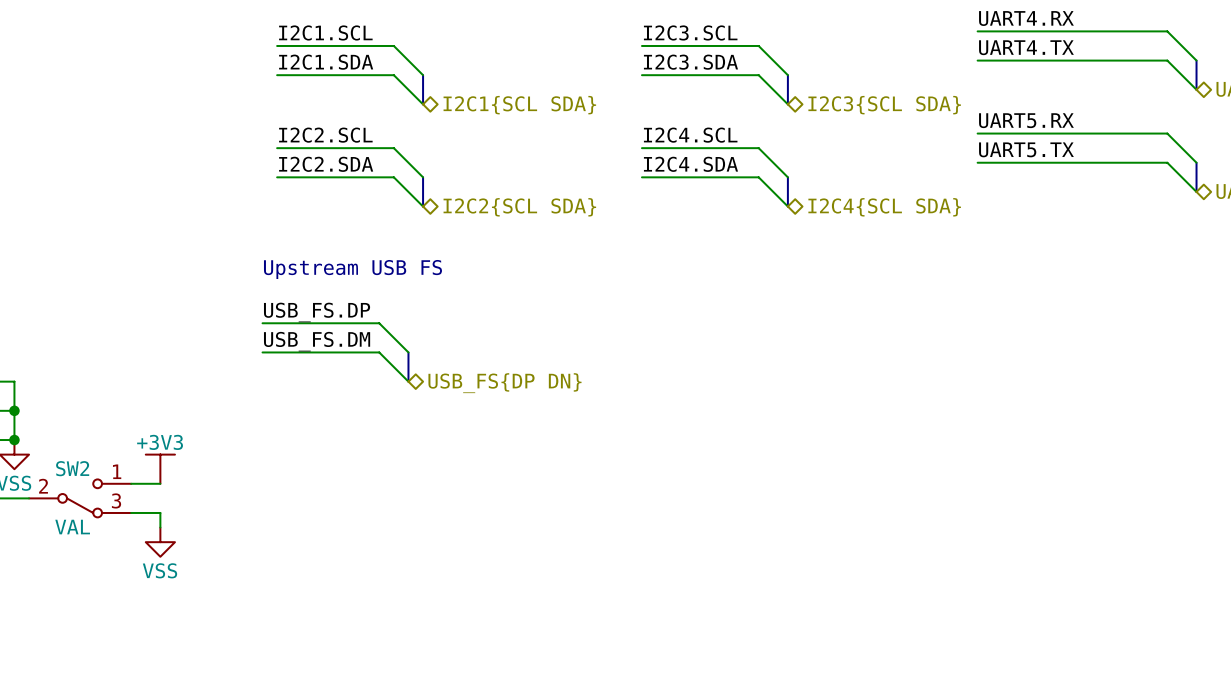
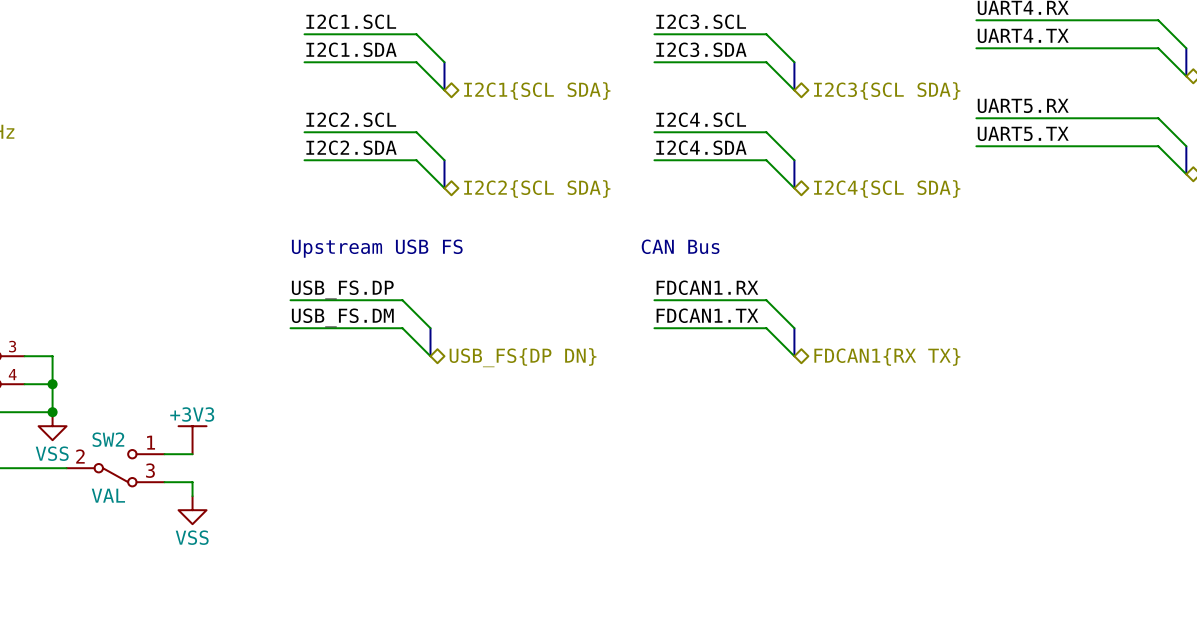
text: none -> CAN Bus (680, 246)
label: none -> FDCAN1.RX (707, 287)
wire: none -> (654, 300) (766, 300) (794, 328)
label: none -> FDCAN1.TX (707, 315)
wire: none -> (654, 328) (766, 328) (794, 356)
bus: none -> (794, 328) (794, 356)
hierarchical label: none -> FDCAN1{RX TX} (887, 356)

